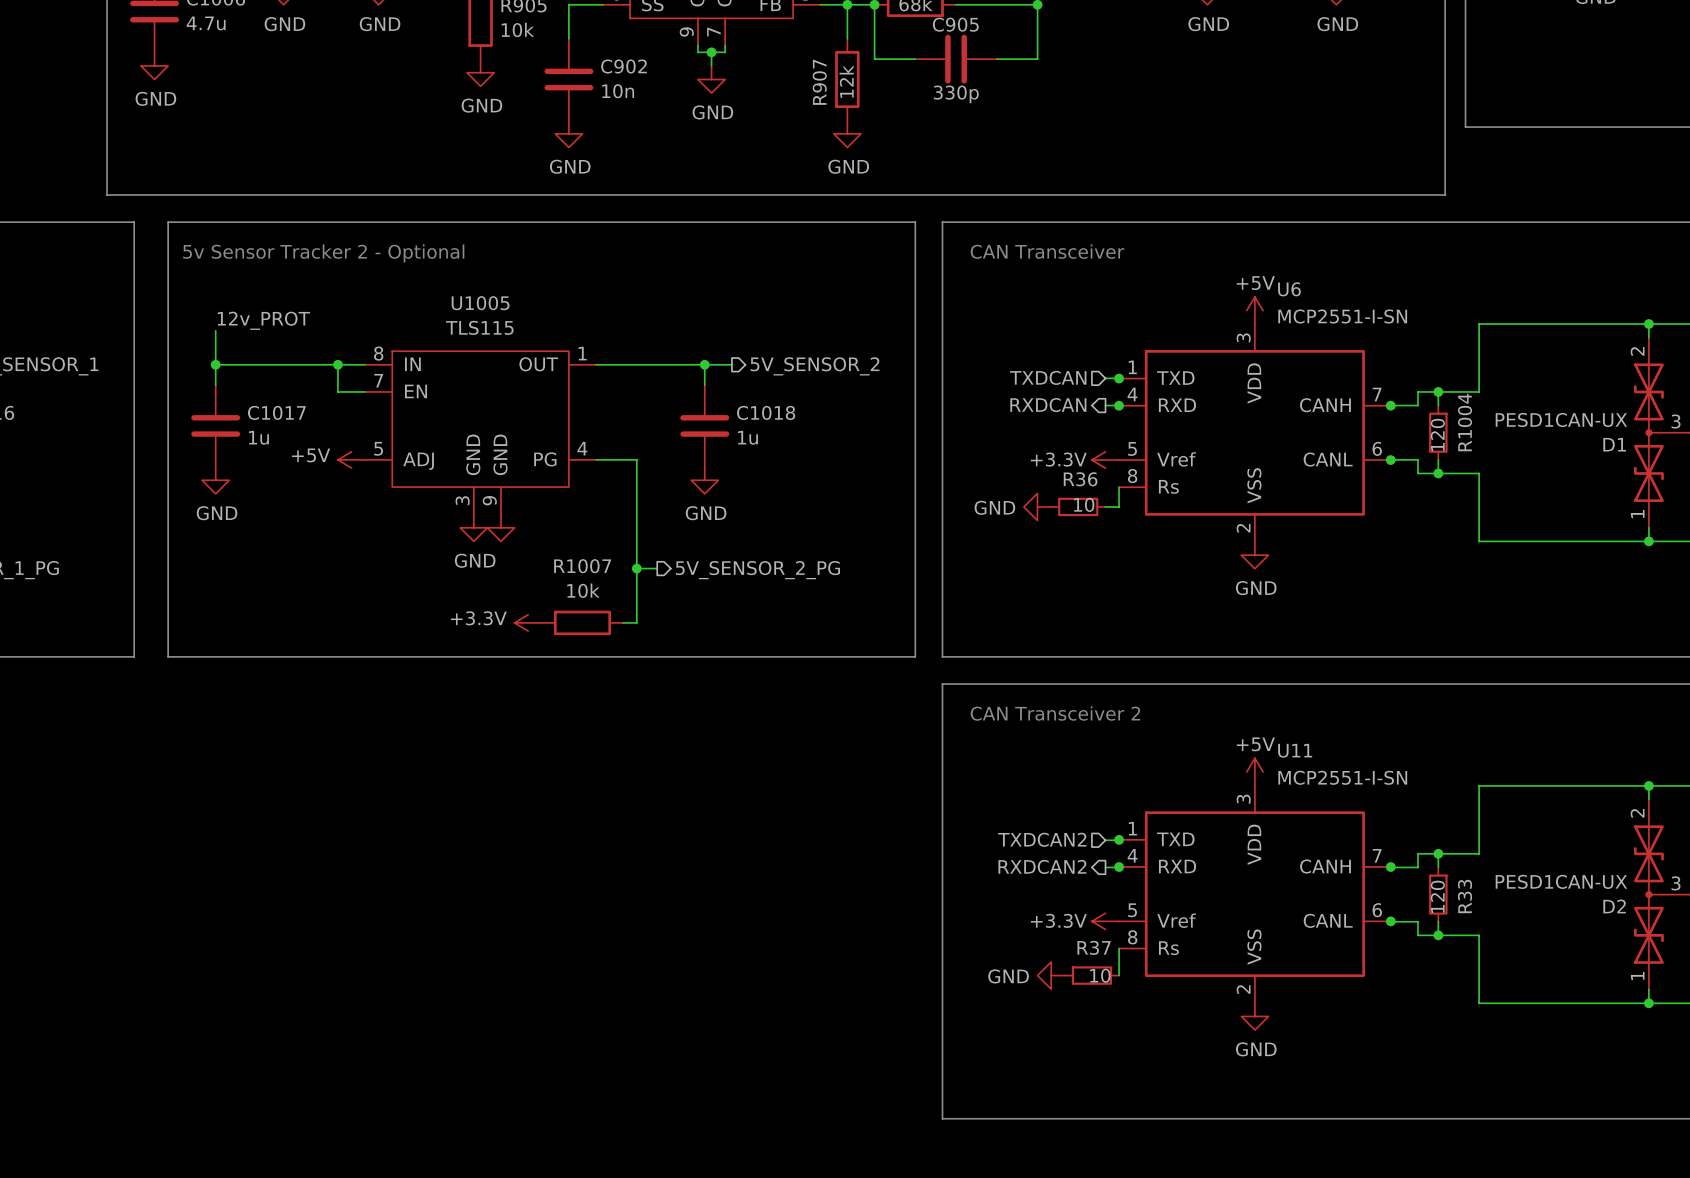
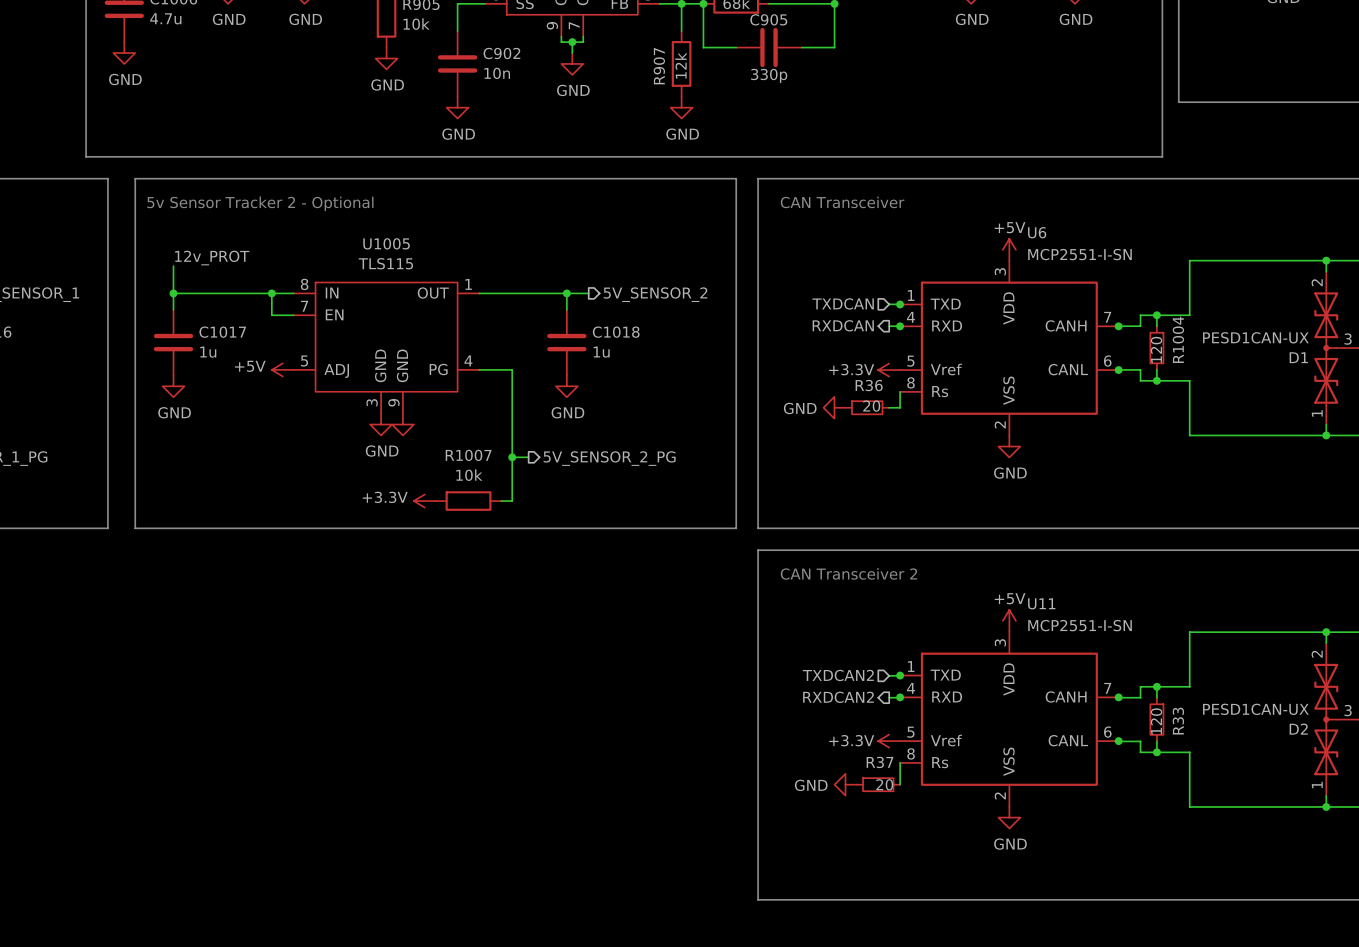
R36 value: 10 (1084, 504) -> 20 (871, 406)
R37 value: 10 (1100, 975) -> 20 (884, 784)

